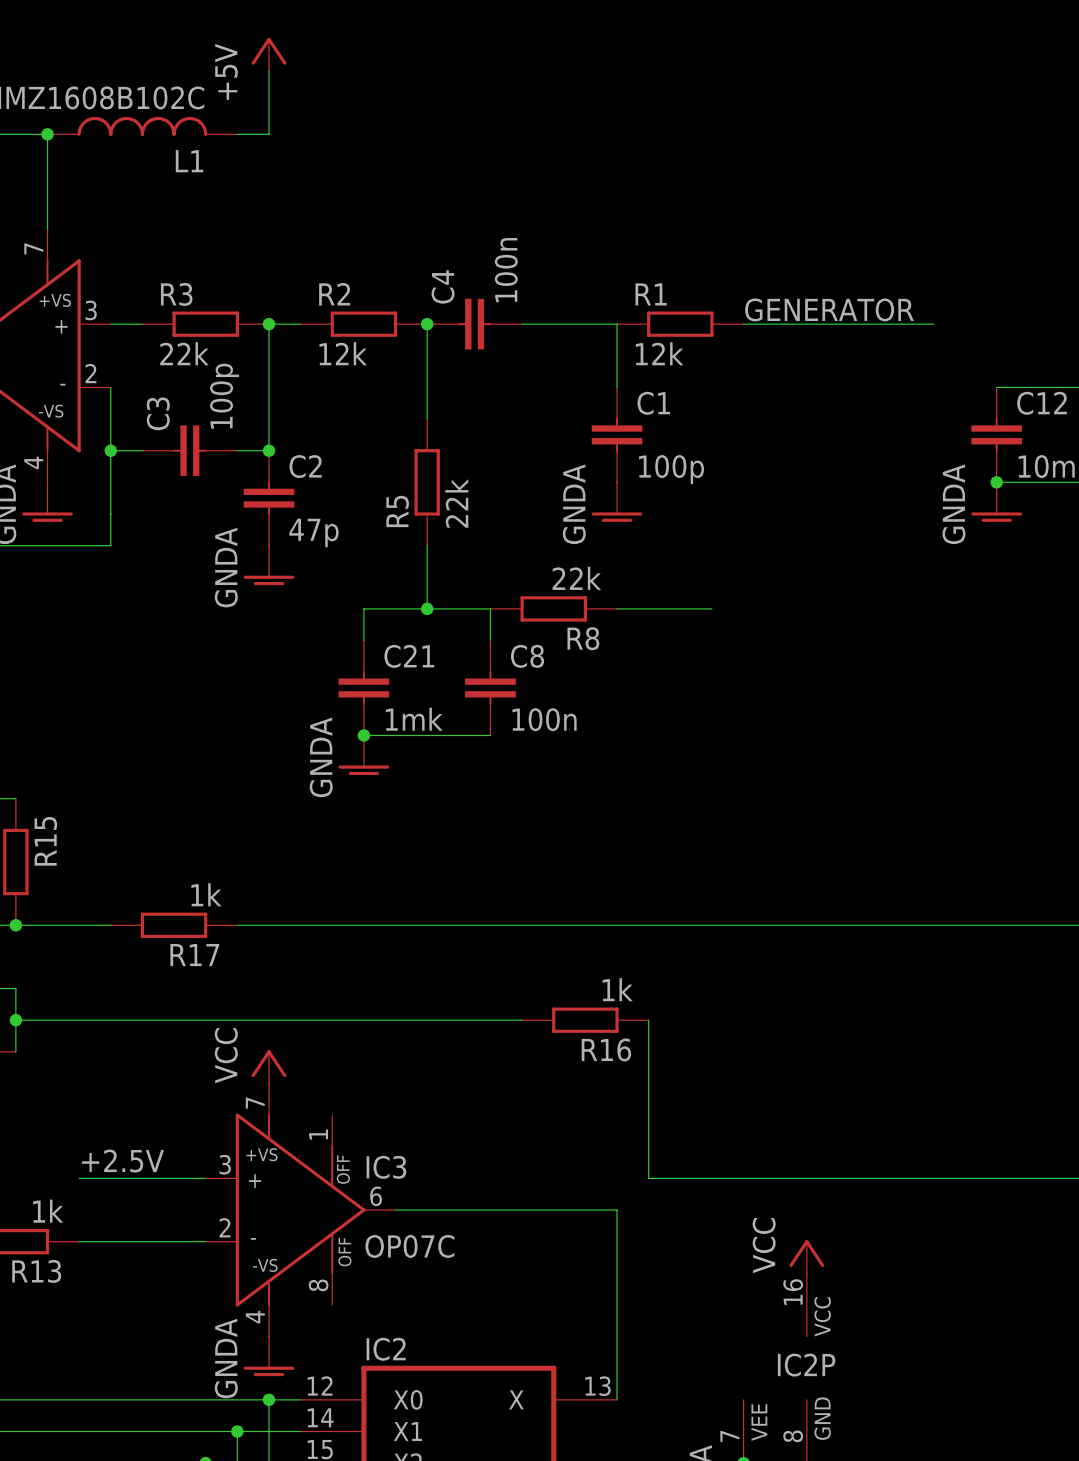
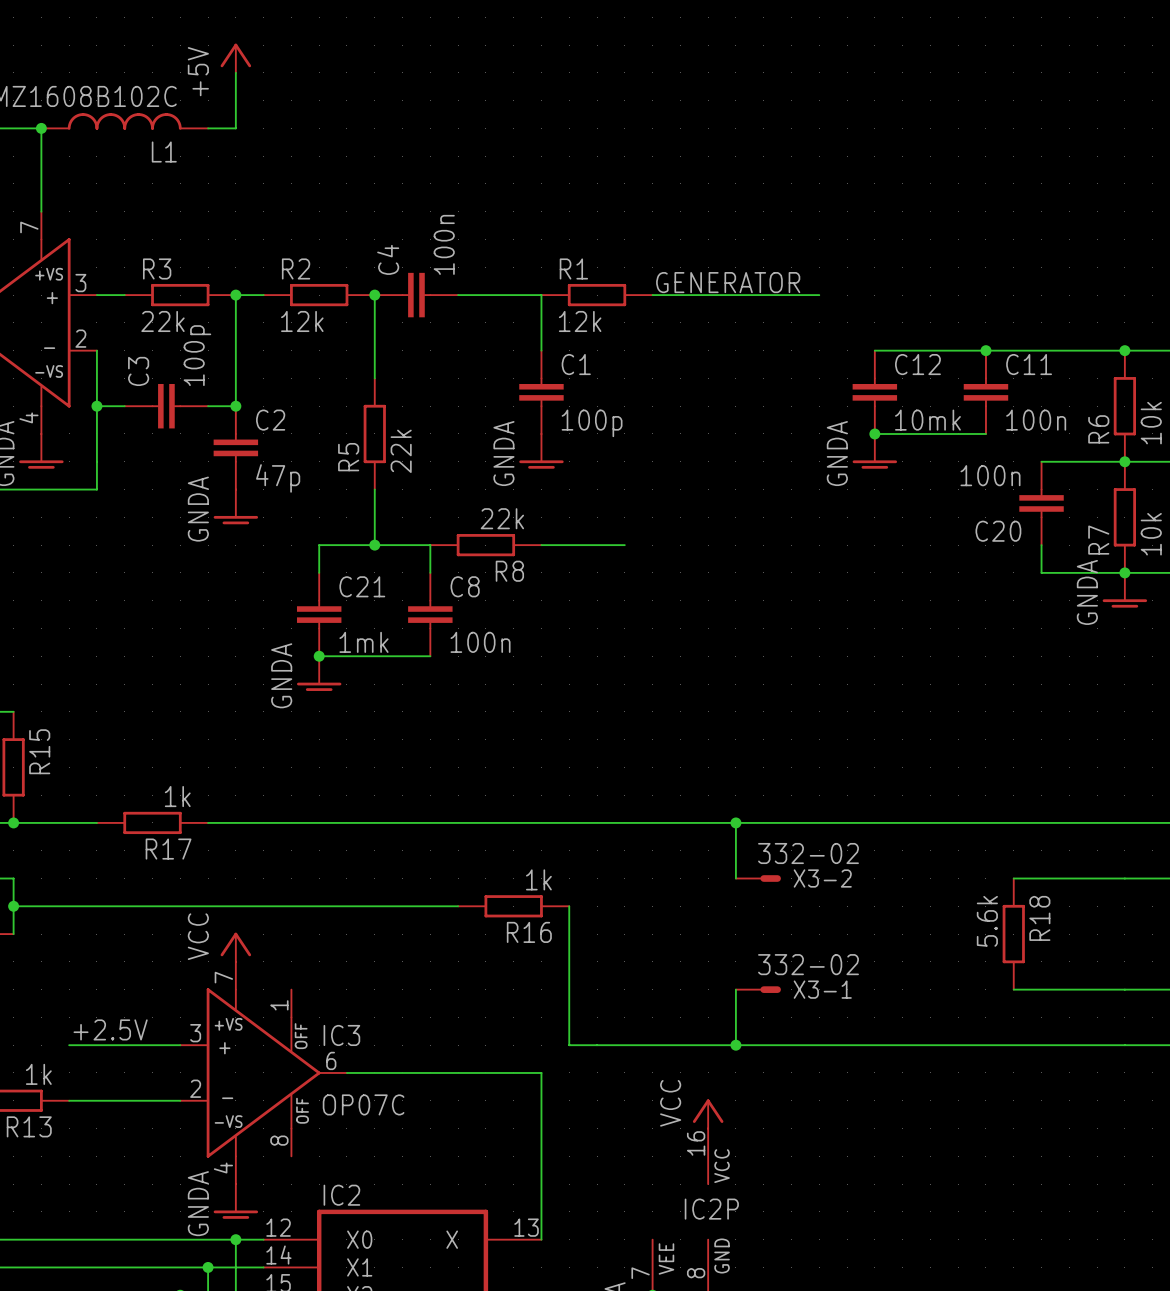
wire: none -> (735, 822) (735, 878)
junction: none -> (735, 822)
X3-2: none -> 332-02 (758, 878)
wire: none -> (735, 989) (735, 1045)
X3-1: none -> 332-02 (758, 989)
junction: none -> (735, 1045)

